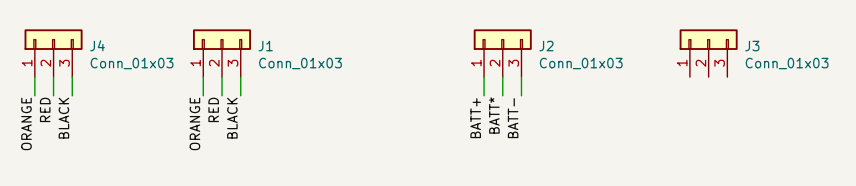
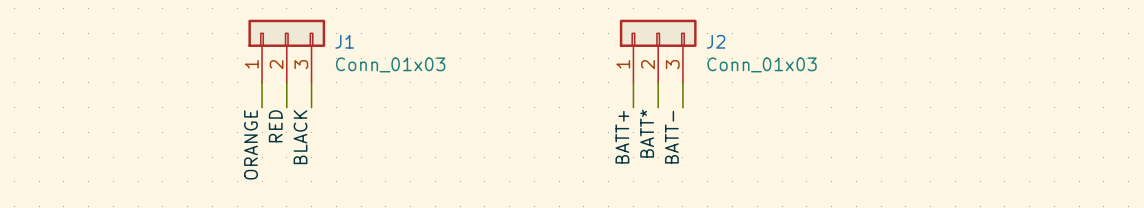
J4: Conn_01x03 (53, 53) -> none
J3: Conn_01x03 (708, 53) -> none
wire: (34, 77) (34, 95) -> none
wire: (53, 77) (53, 95) -> none
wire: (72, 77) (72, 95) -> none
label: RED (45, 109) -> none
label: BLACK (63, 118) -> none
label: ORANGE (26, 123) -> none

